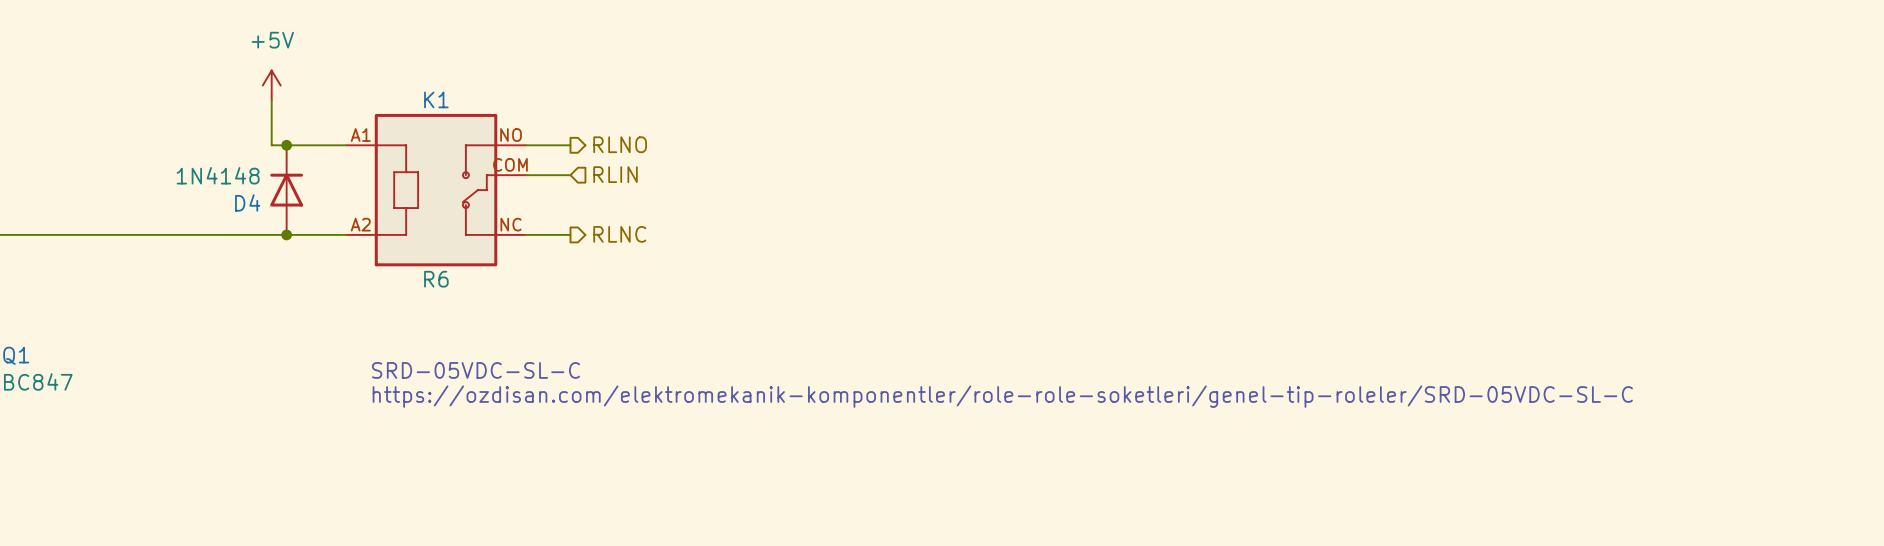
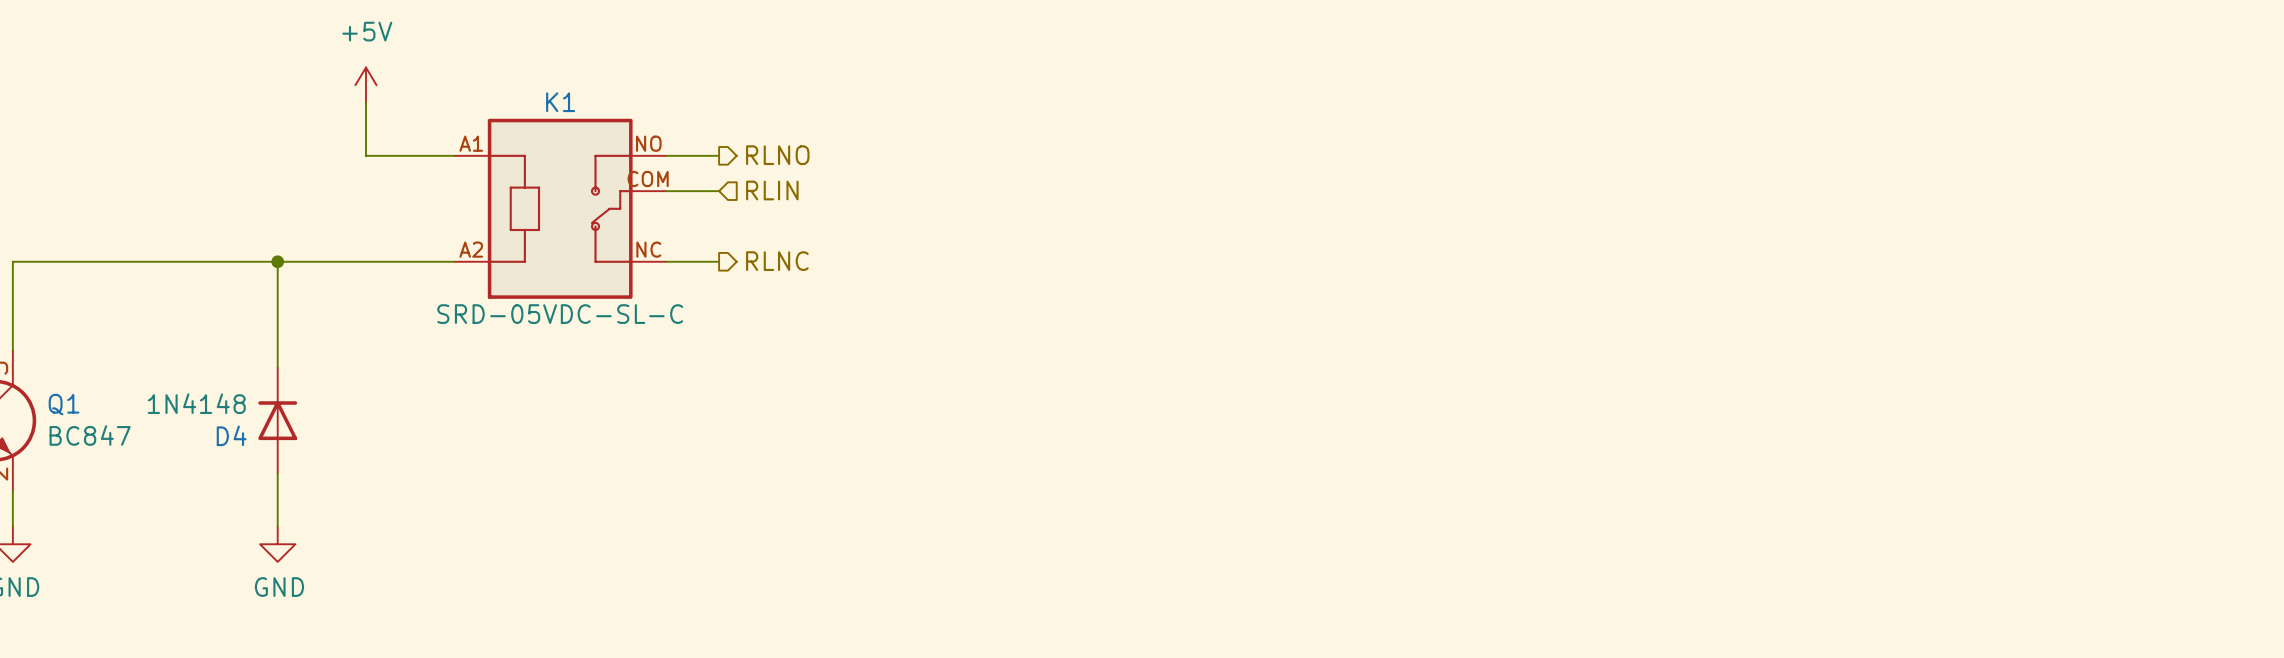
junction: (286, 145) -> none
D4 position: (286, 190) -> (277, 420)
wire: none -> (277, 261) (277, 367)
junction: none -> (277, 261)
junction: (286, 234) -> none
K1 value: R6 (436, 279) -> SRD-05VDC-SL-C (560, 314)
text: SRD-05VDC-SL-C (475, 370) -> none
text: https://ozdisan.com/elektromekanik-komponentler/role-role-soketleri/genel-tip-roleler/SRD-05VDC-SL-C (1002, 396) -> none
wire: none -> (277, 473) (277, 526)
power symbol: none -> GND (277, 544)

